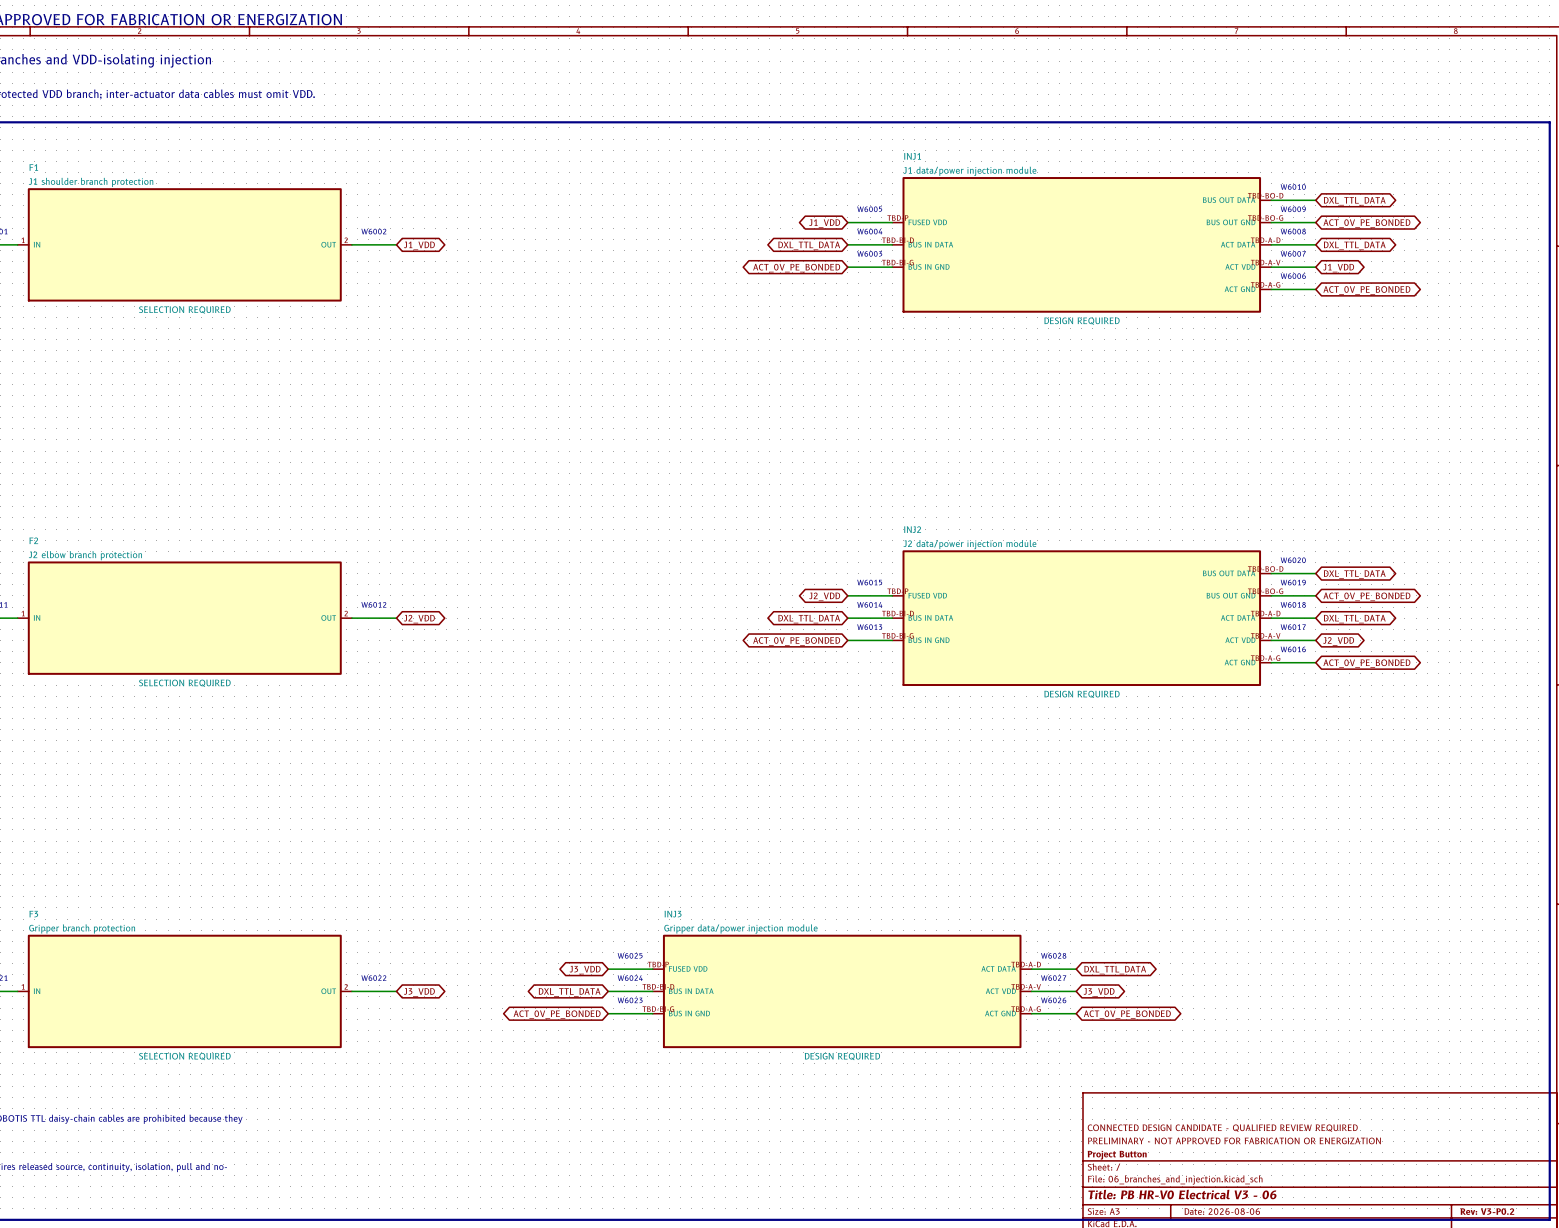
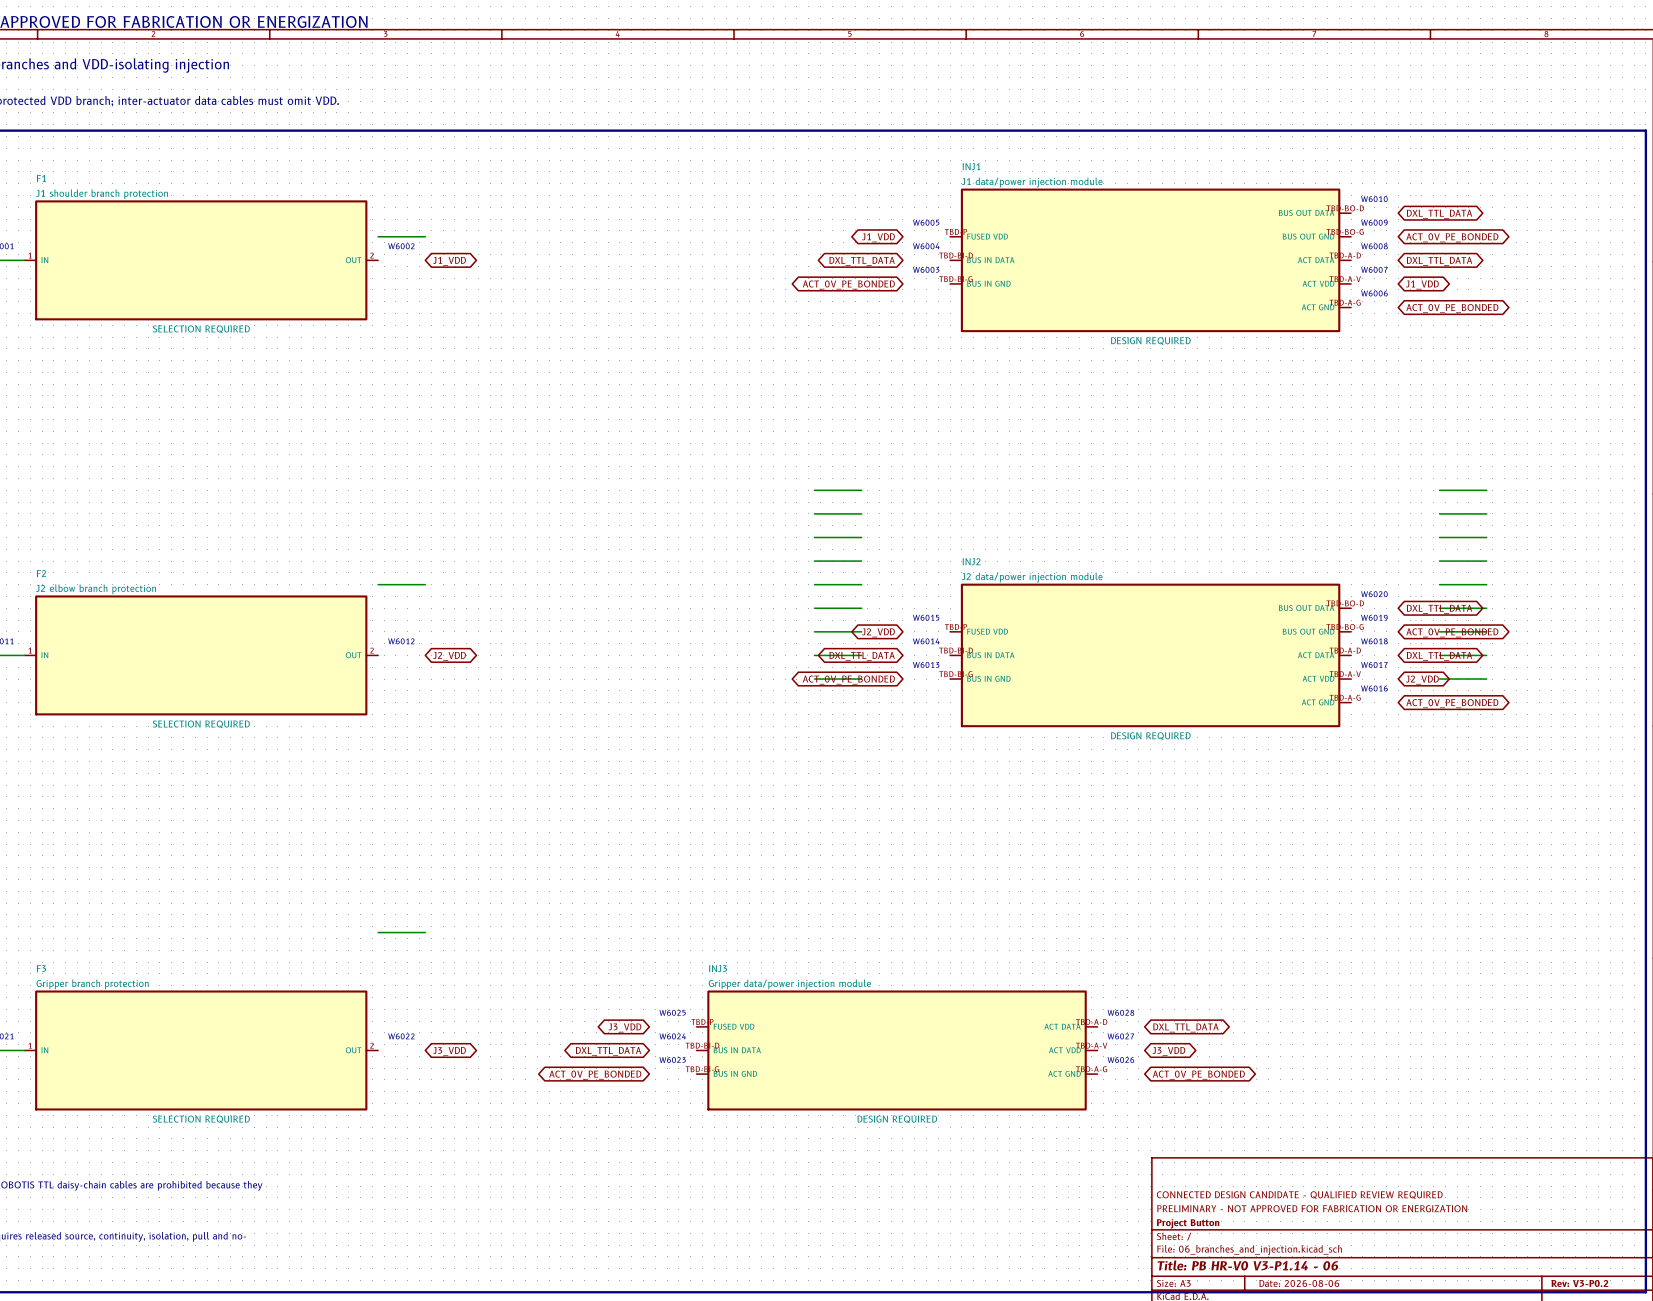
wire: (1271, 200) (1315, 200) -> none
wire: (847, 222) (892, 222) -> none
wire: (1271, 222) (1315, 222) -> none
wire: (351, 244) (396, 244) -> (378, 236) (425, 236)
wire: (847, 244) (892, 244) -> none
wire: (1271, 244) (1315, 244) -> none
wire: (847, 267) (892, 267) -> none
wire: (1271, 267) (1315, 267) -> none
wire: (1271, 289) (1315, 289) -> none
wire: none -> (814, 490) (861, 490)
wire: none -> (1439, 490) (1486, 490)
wire: none -> (814, 513) (861, 513)
wire: none -> (1439, 513) (1486, 513)
wire: none -> (814, 537) (861, 537)
wire: none -> (1439, 537) (1486, 537)
wire: none -> (814, 561) (861, 561)
wire: none -> (1439, 561) (1486, 561)
wire: none -> (814, 584) (861, 584)
wire: none -> (814, 608) (861, 608)
wire: (1271, 573) (1315, 573) -> (1439, 584) (1486, 584)
wire: (847, 595) (892, 595) -> (814, 631) (861, 631)
wire: (1271, 595) (1315, 595) -> (1439, 608) (1486, 608)
wire: (351, 618) (396, 618) -> (378, 584) (425, 584)
wire: (847, 618) (892, 618) -> (814, 655) (861, 655)
wire: (1271, 618) (1315, 618) -> (1439, 631) (1486, 631)
wire: (847, 640) (892, 640) -> (814, 679) (861, 679)
wire: (1271, 640) (1315, 640) -> (1439, 655) (1486, 655)
wire: (1271, 662) (1315, 662) -> (1439, 679) (1486, 679)
wire: none -> (378, 932) (425, 932)
wire: (608, 969) (652, 969) -> none
wire: (1031, 969) (1076, 969) -> none
wire: (351, 991) (396, 991) -> none
wire: (608, 991) (652, 991) -> none
wire: (1031, 991) (1076, 991) -> none
wire: (608, 1013) (652, 1013) -> none
wire: (1031, 1013) (1076, 1013) -> none
title block: Title: PB HR-V0 Electrical V3 - 06 (1182, 1194) -> Title: PB HR-V0 V3-P1.14 - 06 (1247, 1265)

